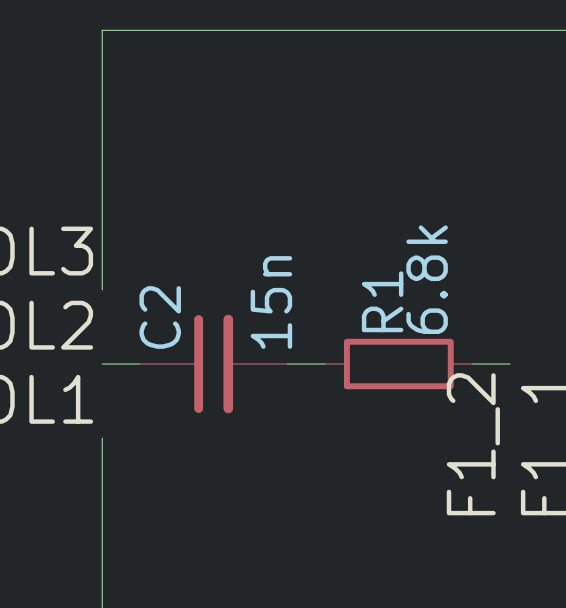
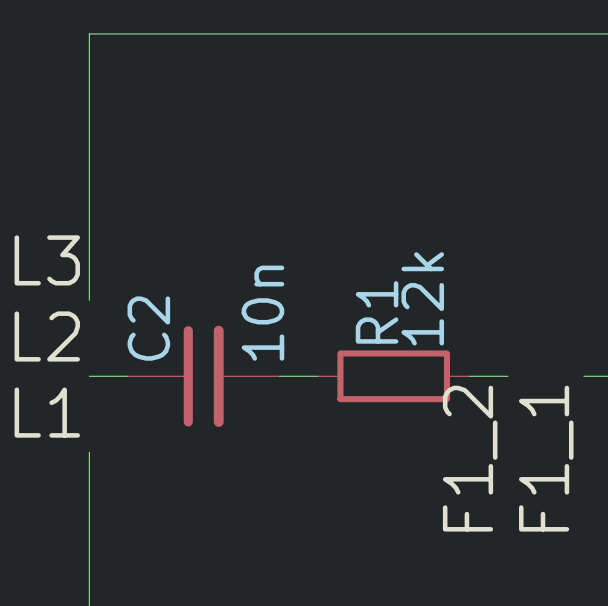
R1 value: 6.8k (427, 279) -> 12k (422, 298)
C2 value: 15n (271, 302) -> 10n (262, 313)

